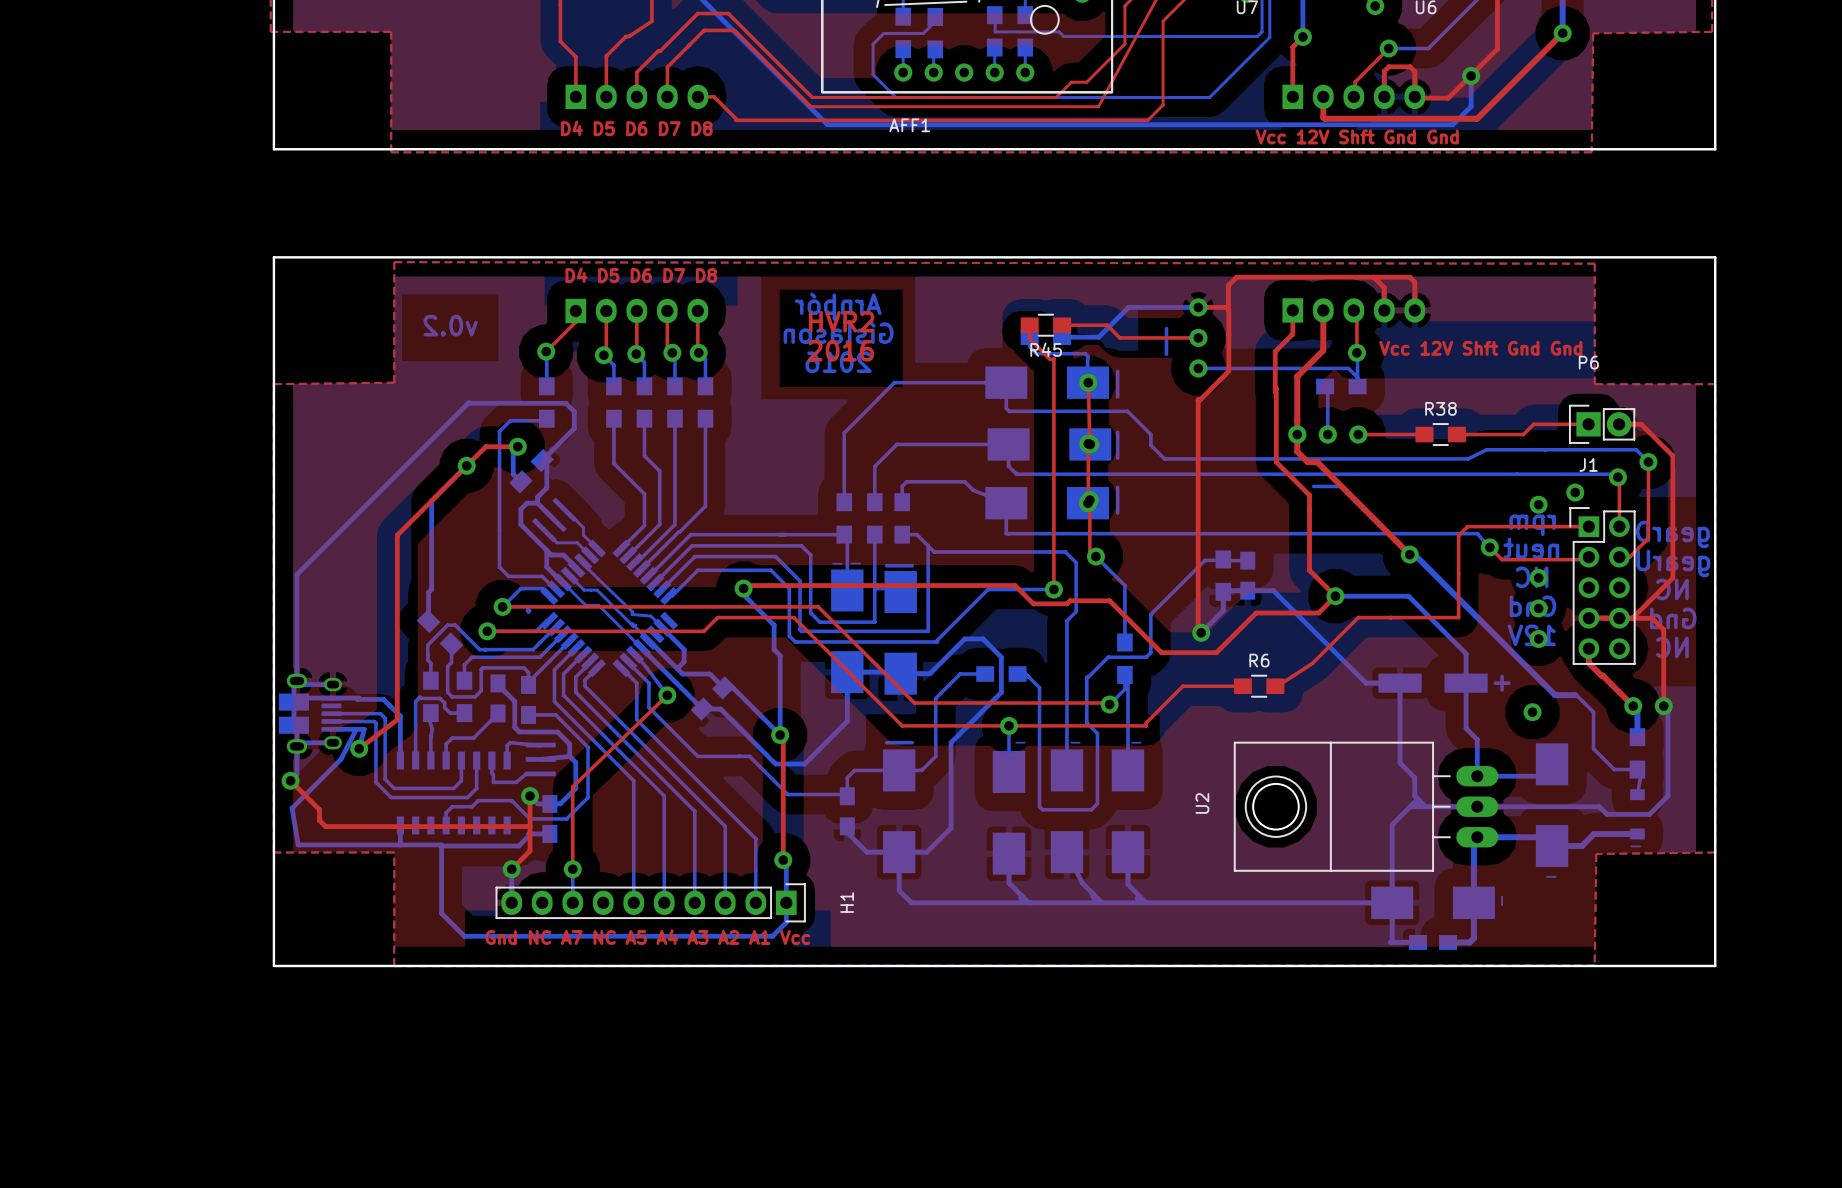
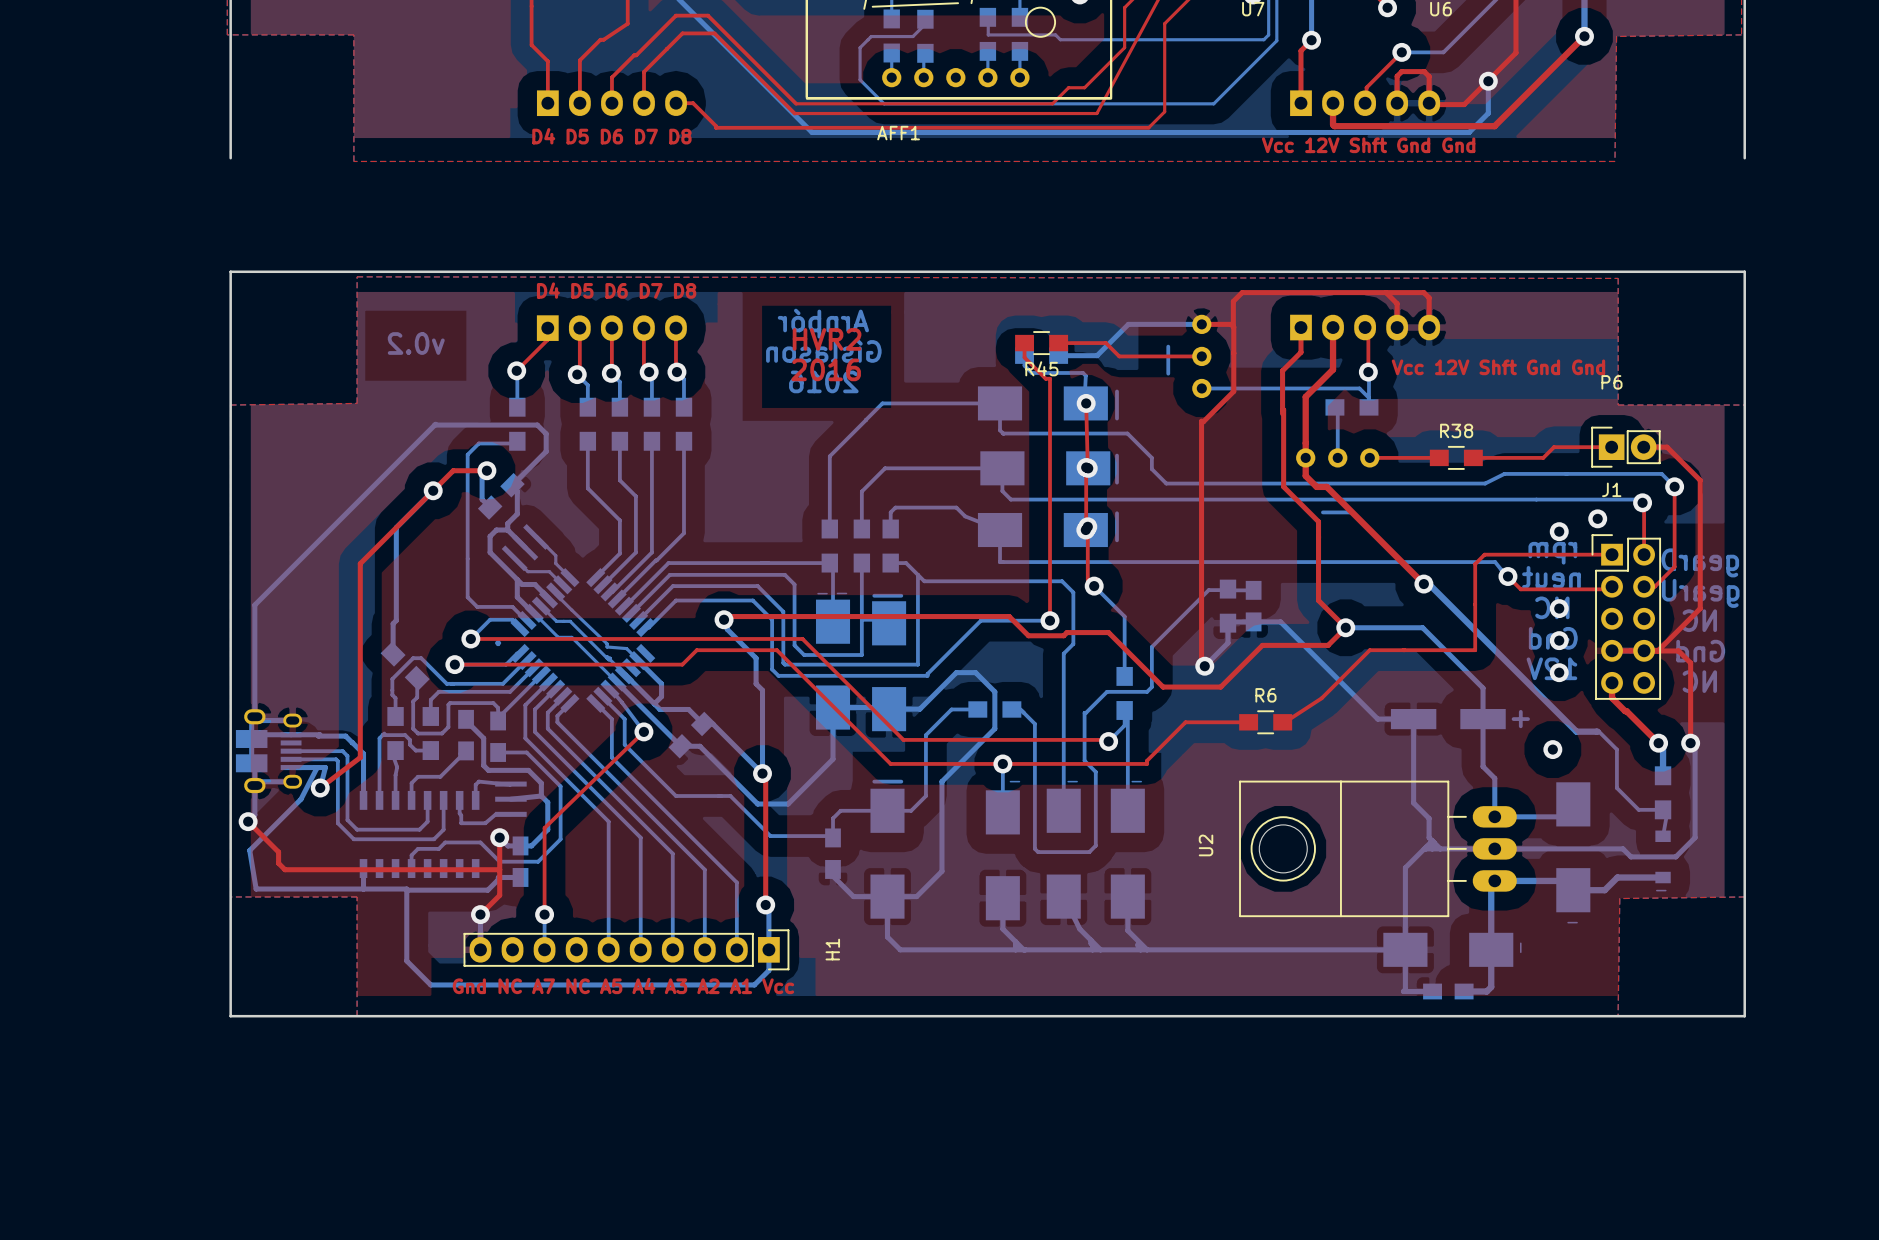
board edge: (273, 149) (1715, 149) -> none

